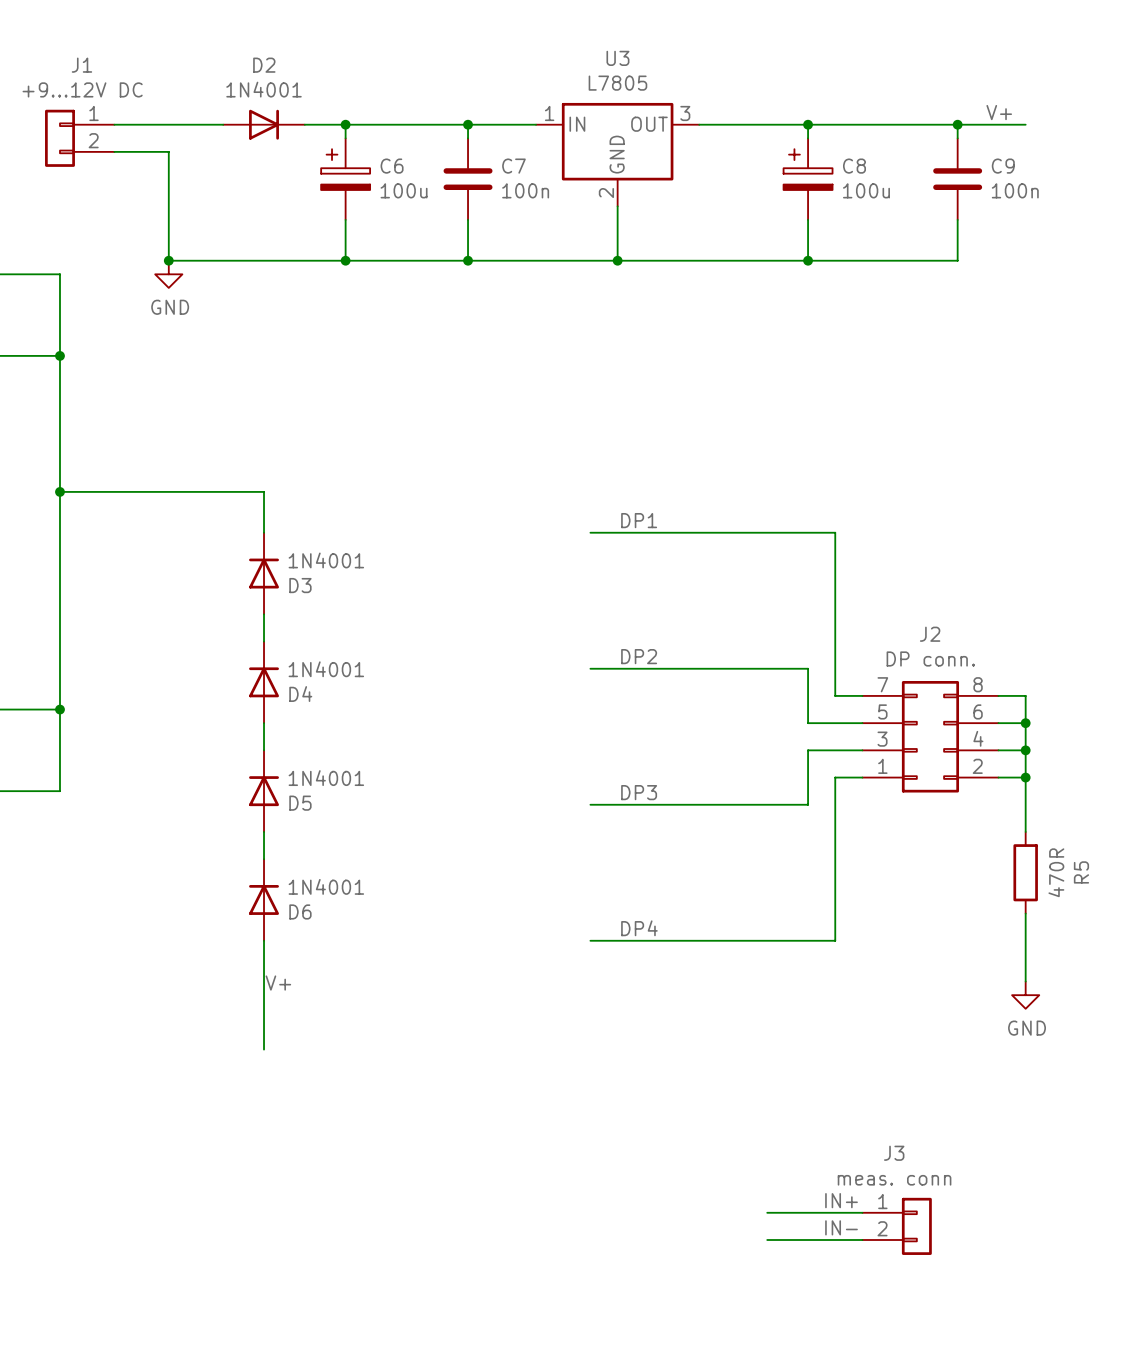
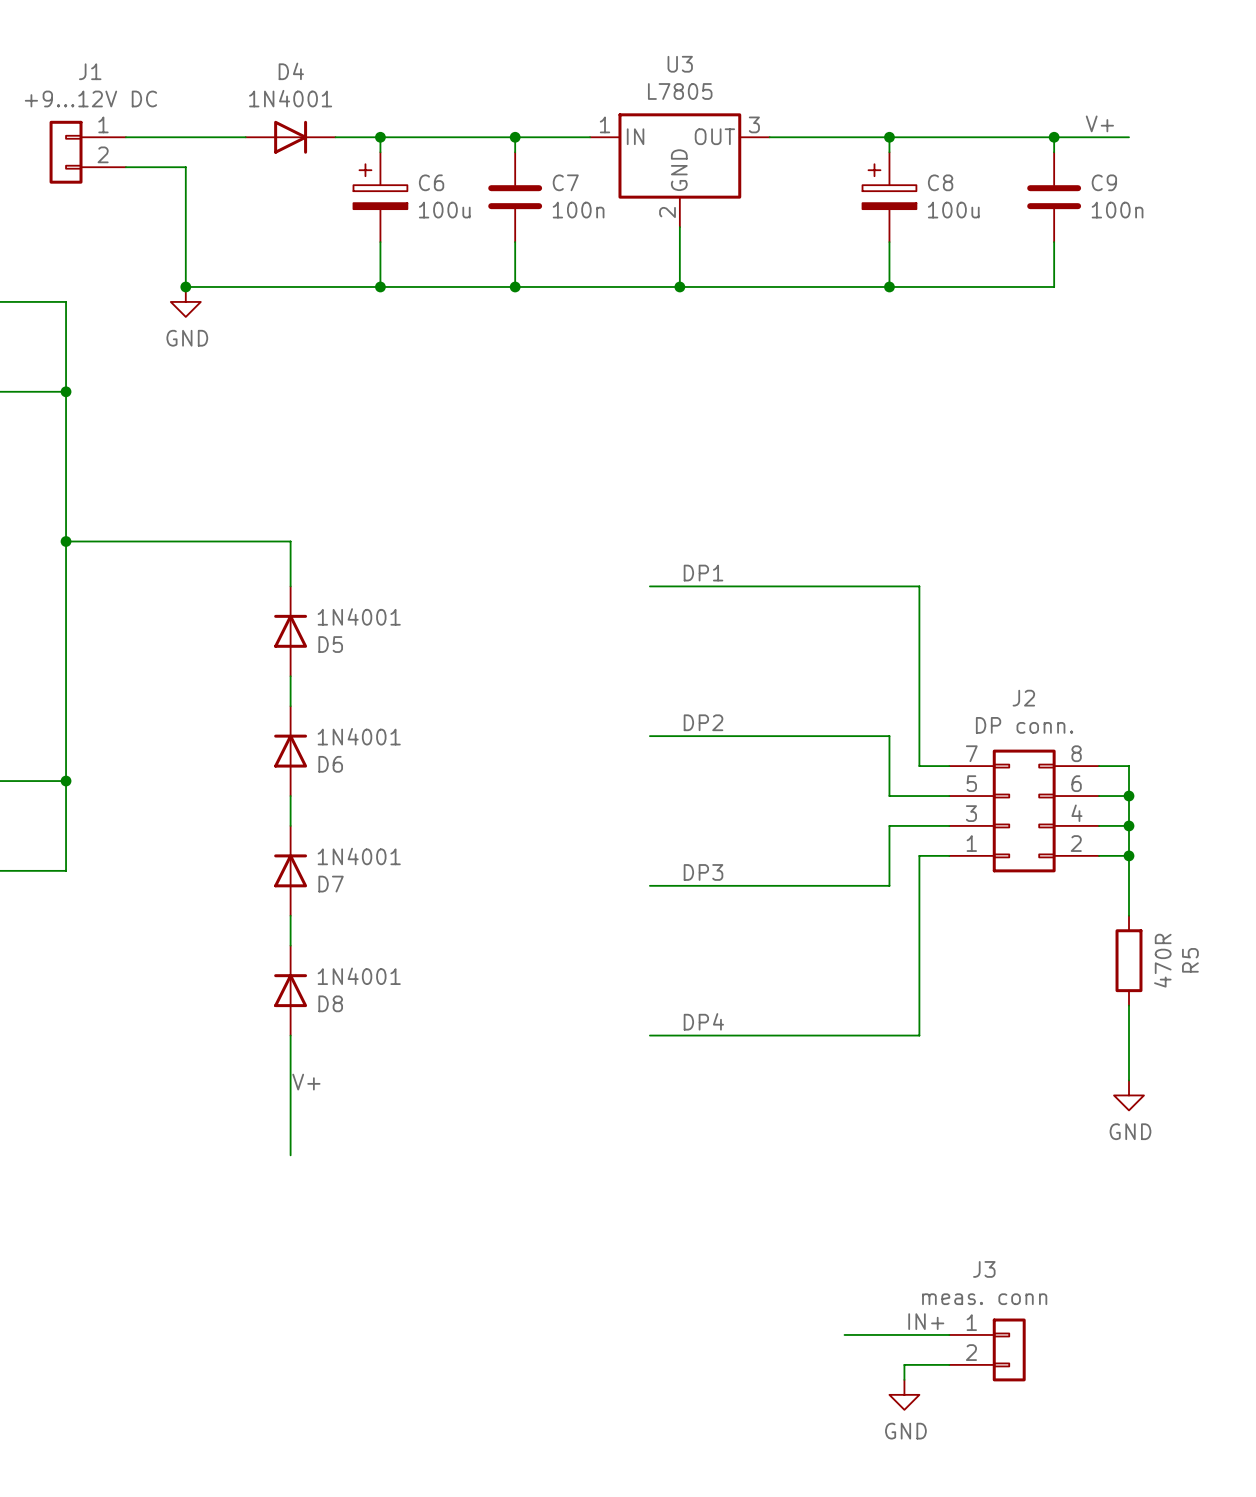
D2 name: D2 (264, 65) -> D4 (291, 71)
D3 name: D3 (300, 585) -> D5 (330, 644)
D4 name: D4 (300, 694) -> D6 (330, 764)
D5 name: D5 (300, 803) -> D7 (331, 884)
D6 name: D6 (300, 911) -> D8 (330, 1003)
label: IN- (841, 1227) -> none
wire: (767, 1240) (821, 1240) -> (904, 1379) (904, 1364)
power symbol: none -> GND (904, 1394)

